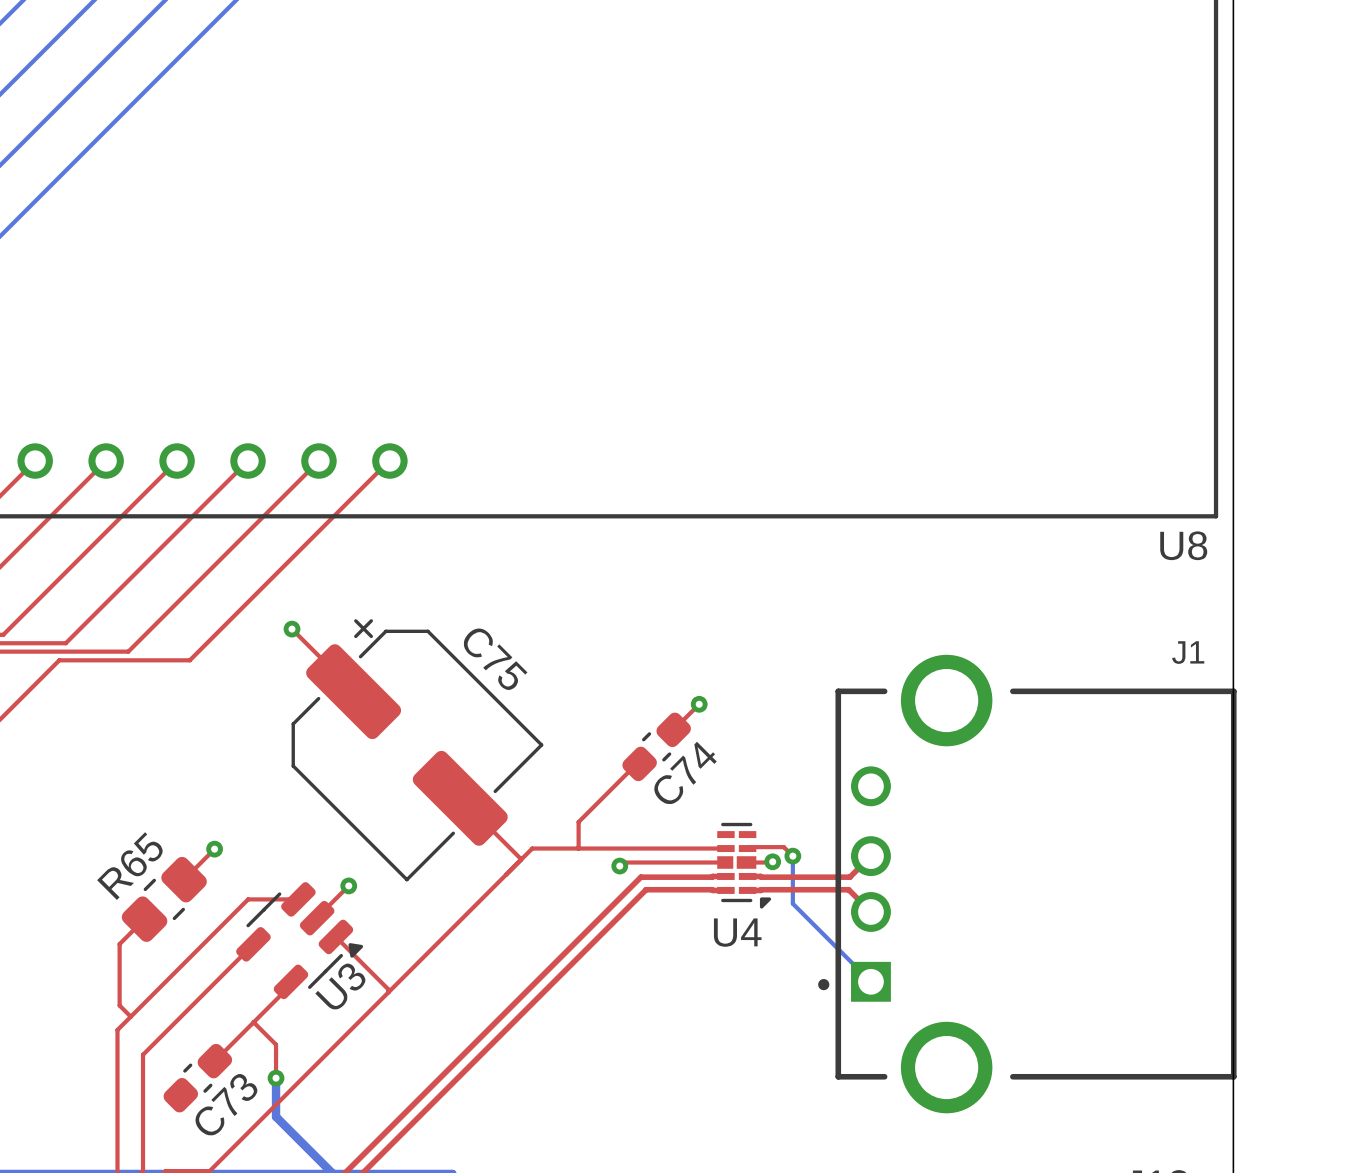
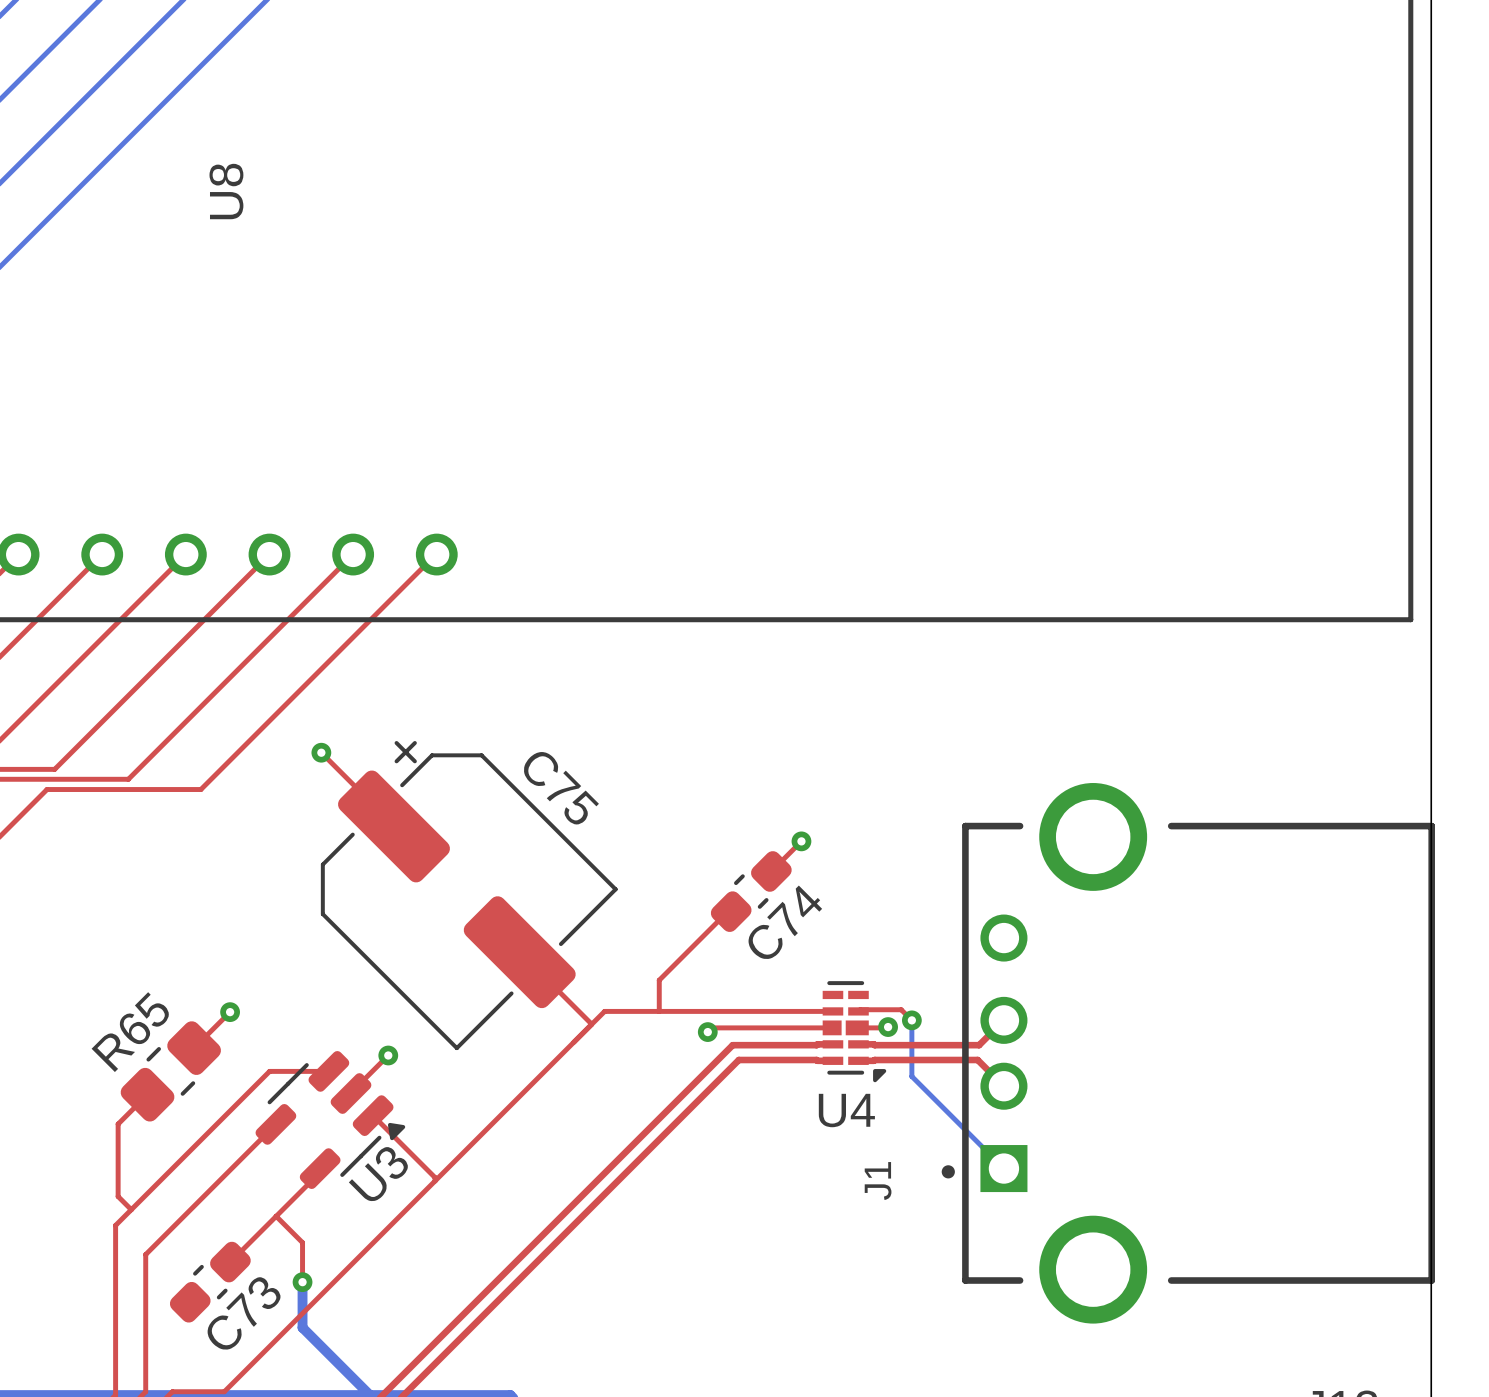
U8 name rotation: 0° (1183, 545) -> 90° counterclockwise (226, 191)
U8 name position: U8 (1183, 545) -> U8 (226, 191)
J1 name rotation: 0° (1188, 652) -> 90° counterclockwise (878, 1181)
J1 name position: J1 (1188, 652) -> J1 (878, 1181)

